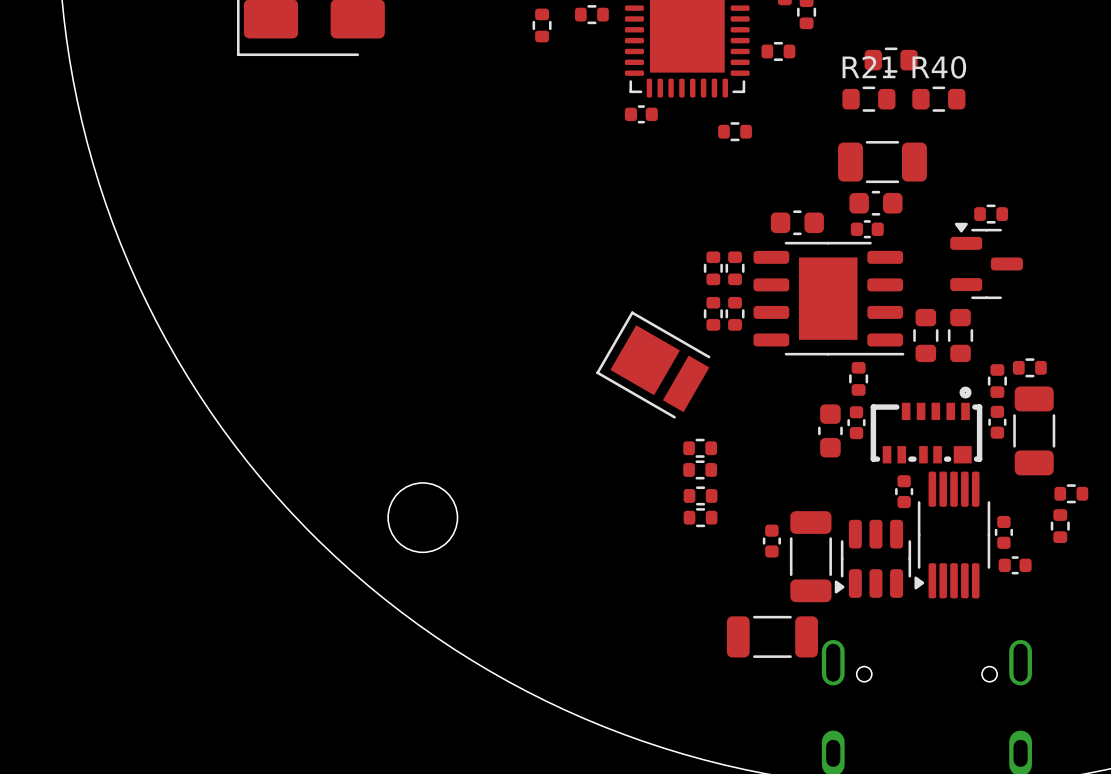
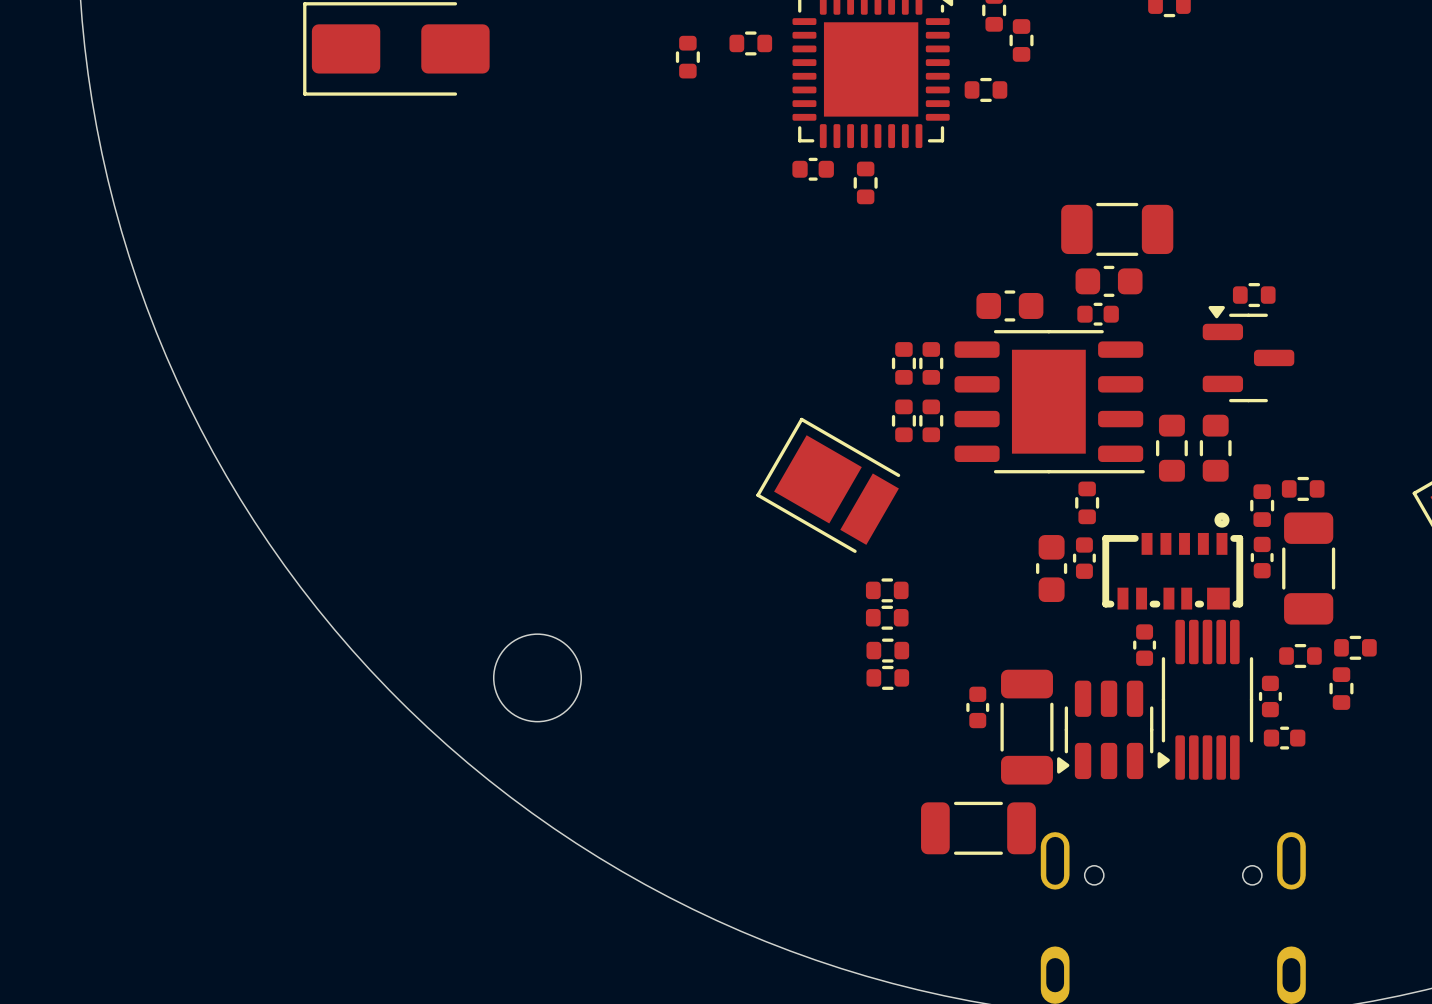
part: (891, 60) -> none
R21: (868, 99) -> none
R40: (938, 99) -> none
part rotation: 0° (735, 131) -> 90° clockwise (865, 182)
part position: (735, 131) -> (865, 182)
part: none -> (1300, 656)

